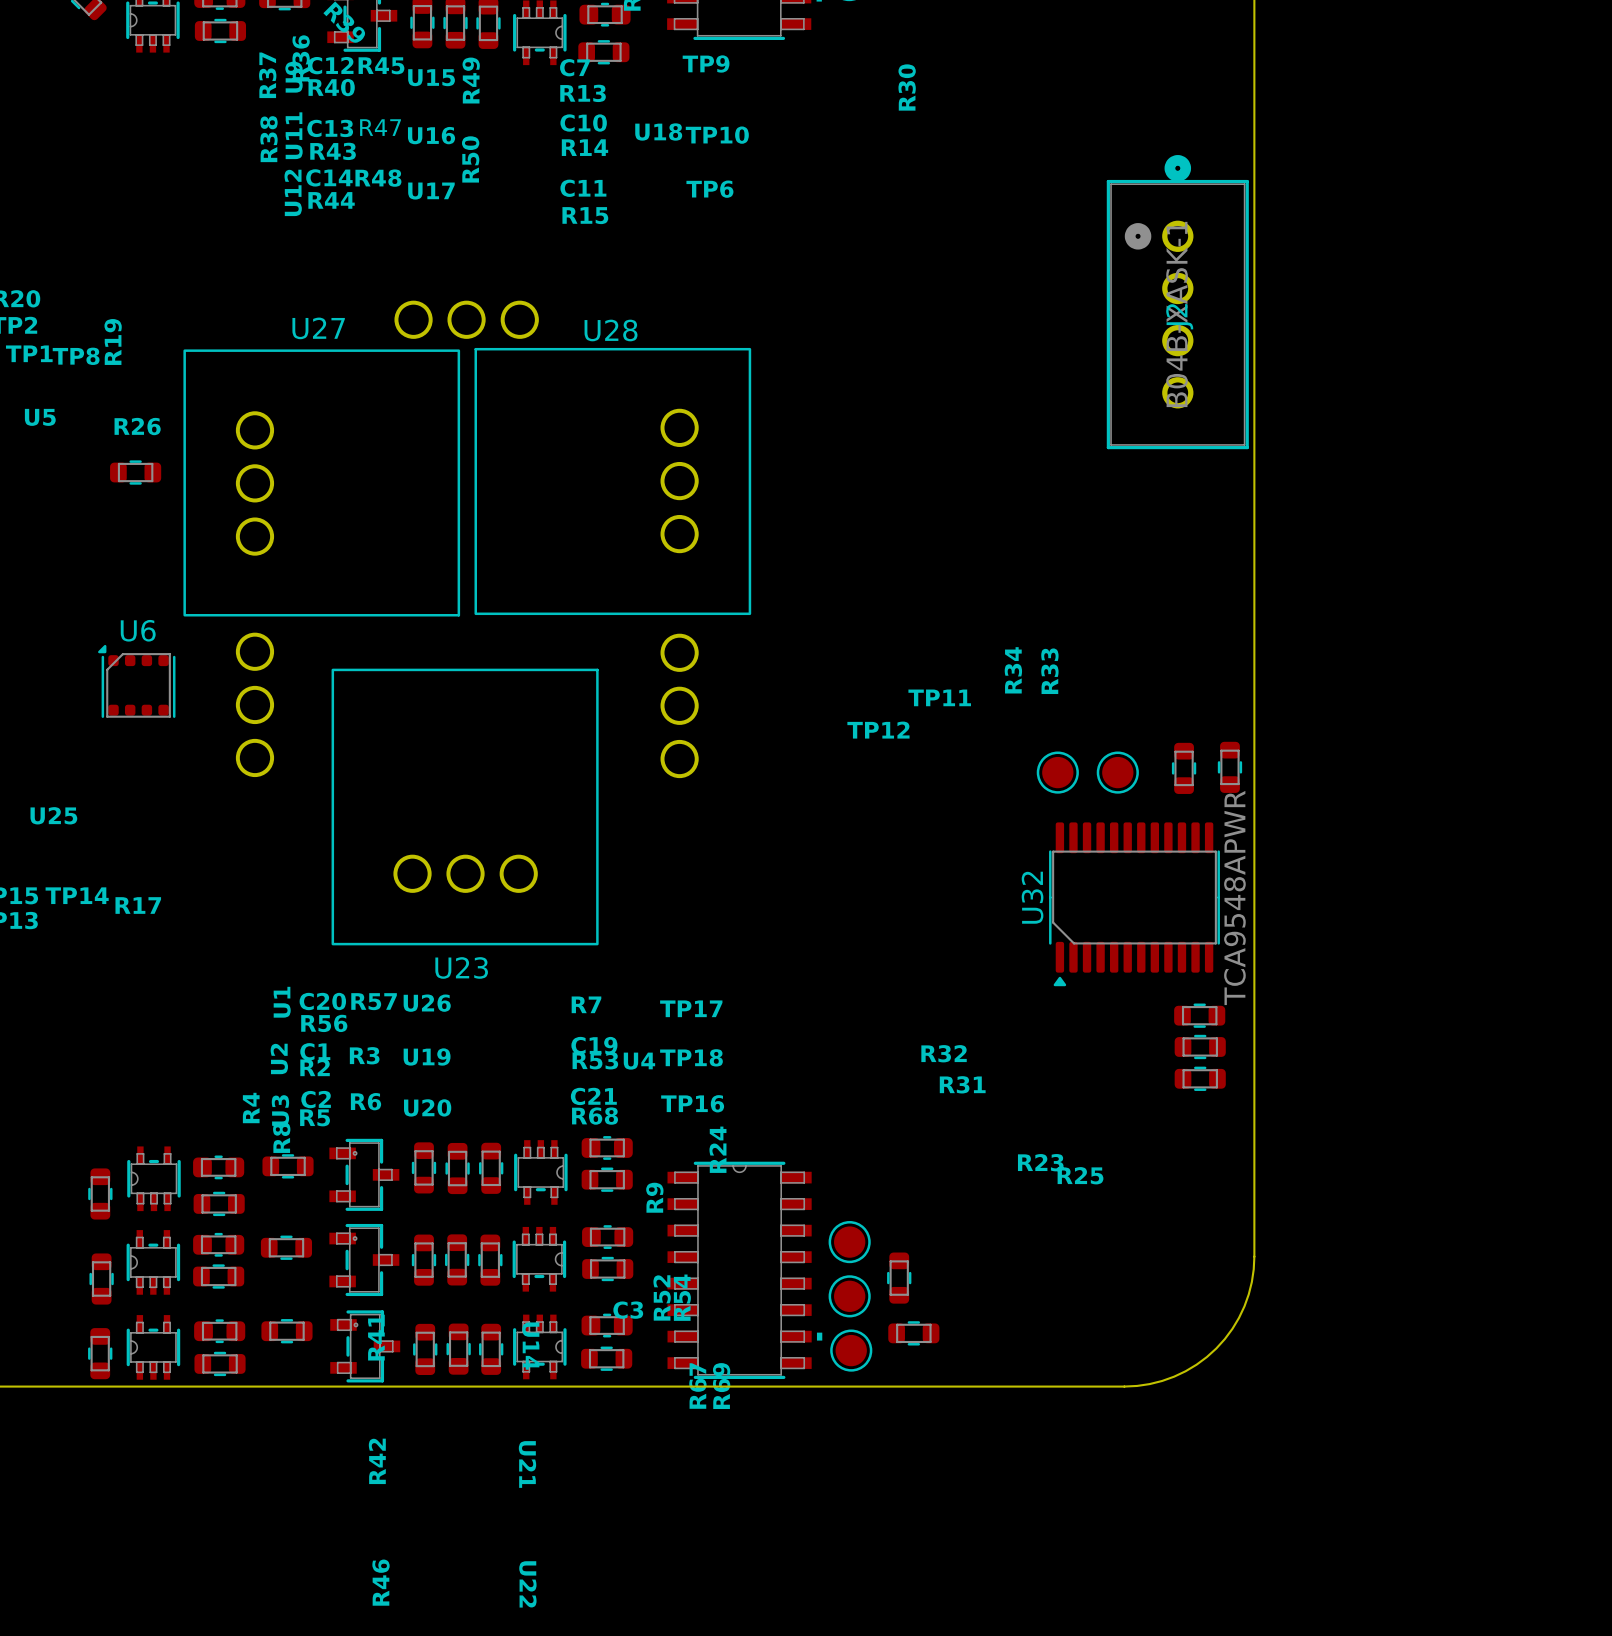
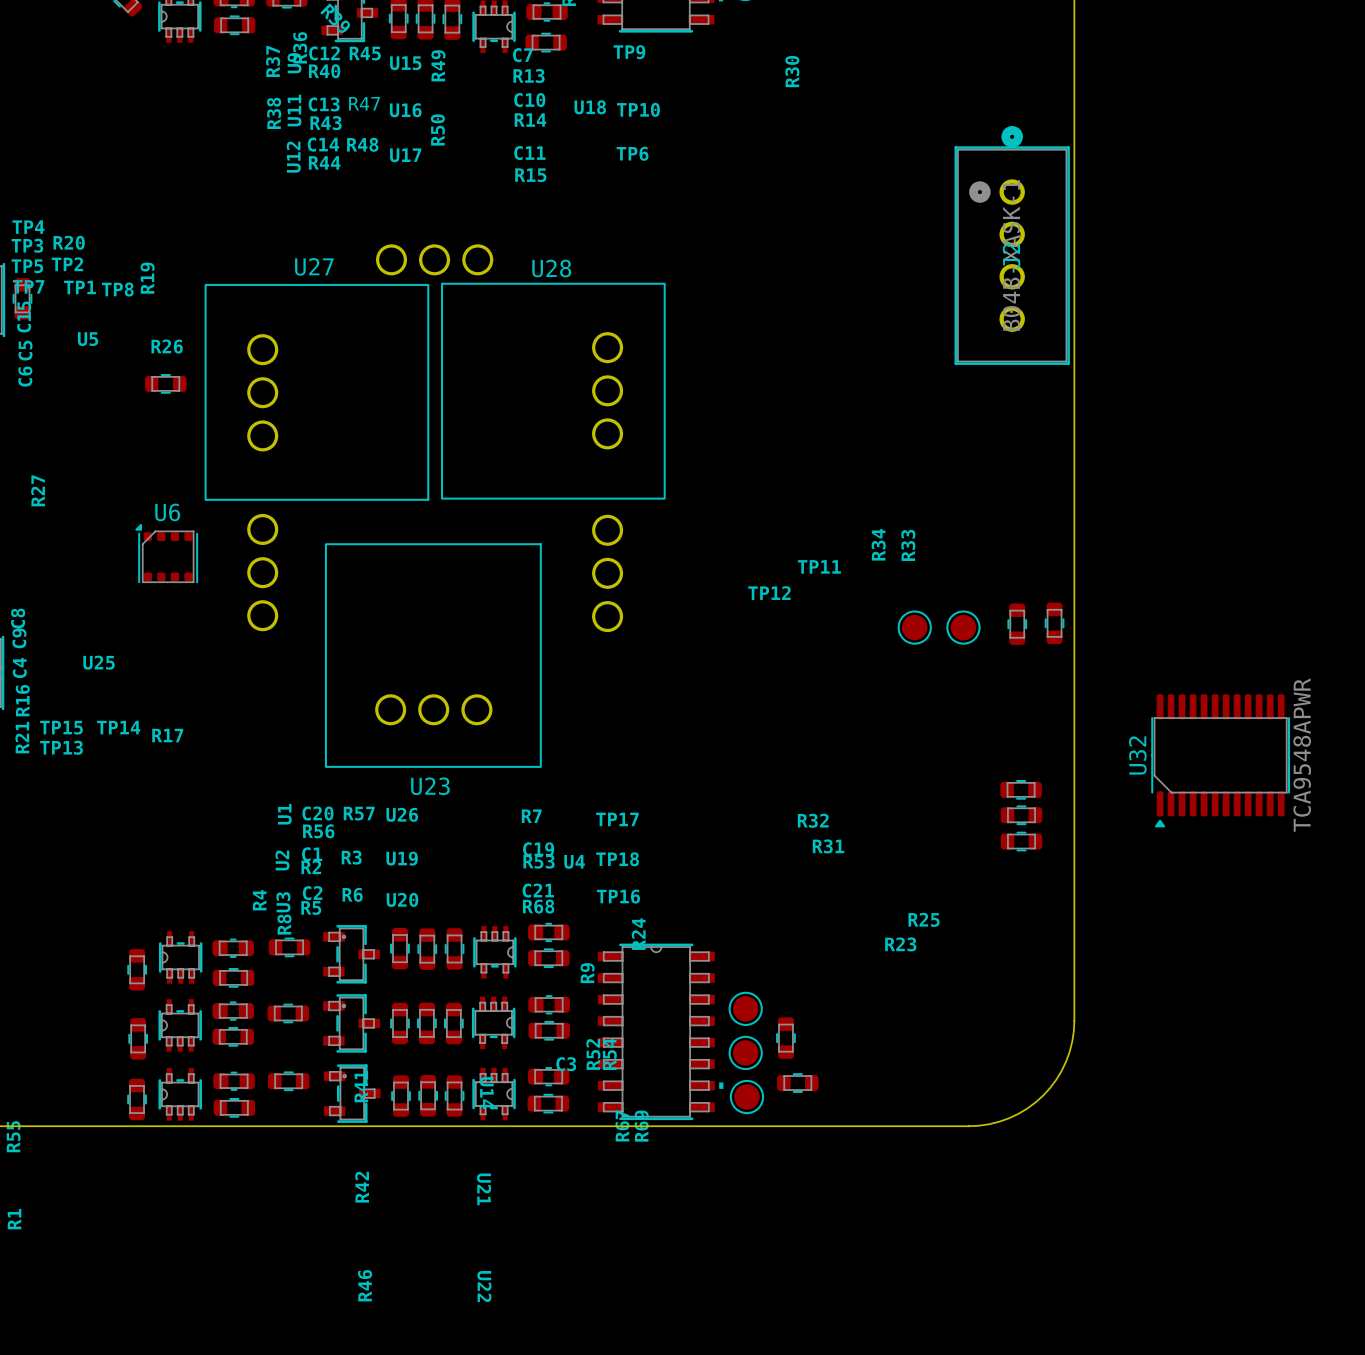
U32 position: (1134, 904) -> (1220, 760)
R25 position: (1199, 1015) -> (1021, 789)
R32 position: (1200, 1046) -> (1021, 815)
R31 position: (1200, 1078) -> (1021, 841)

